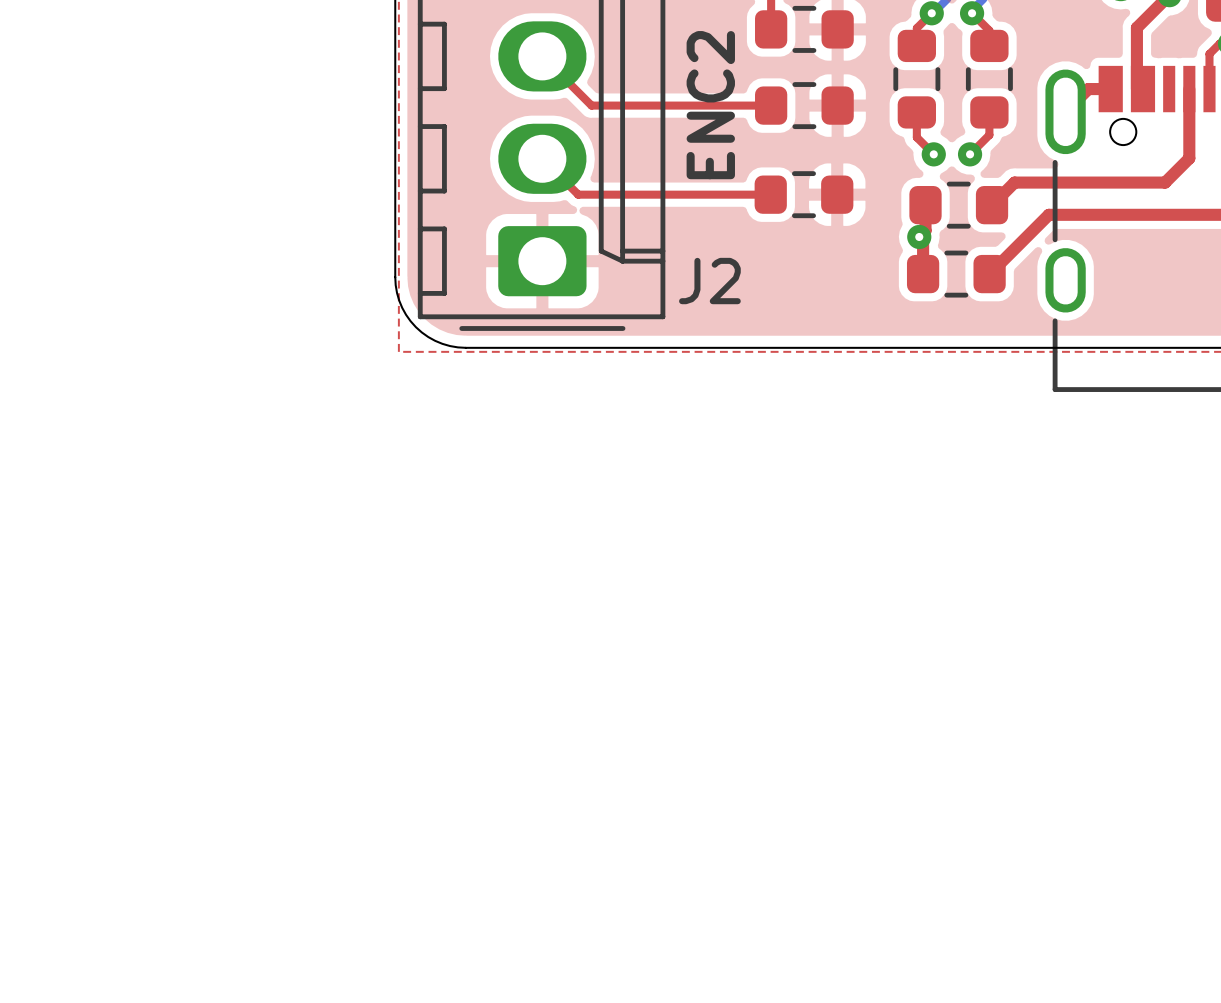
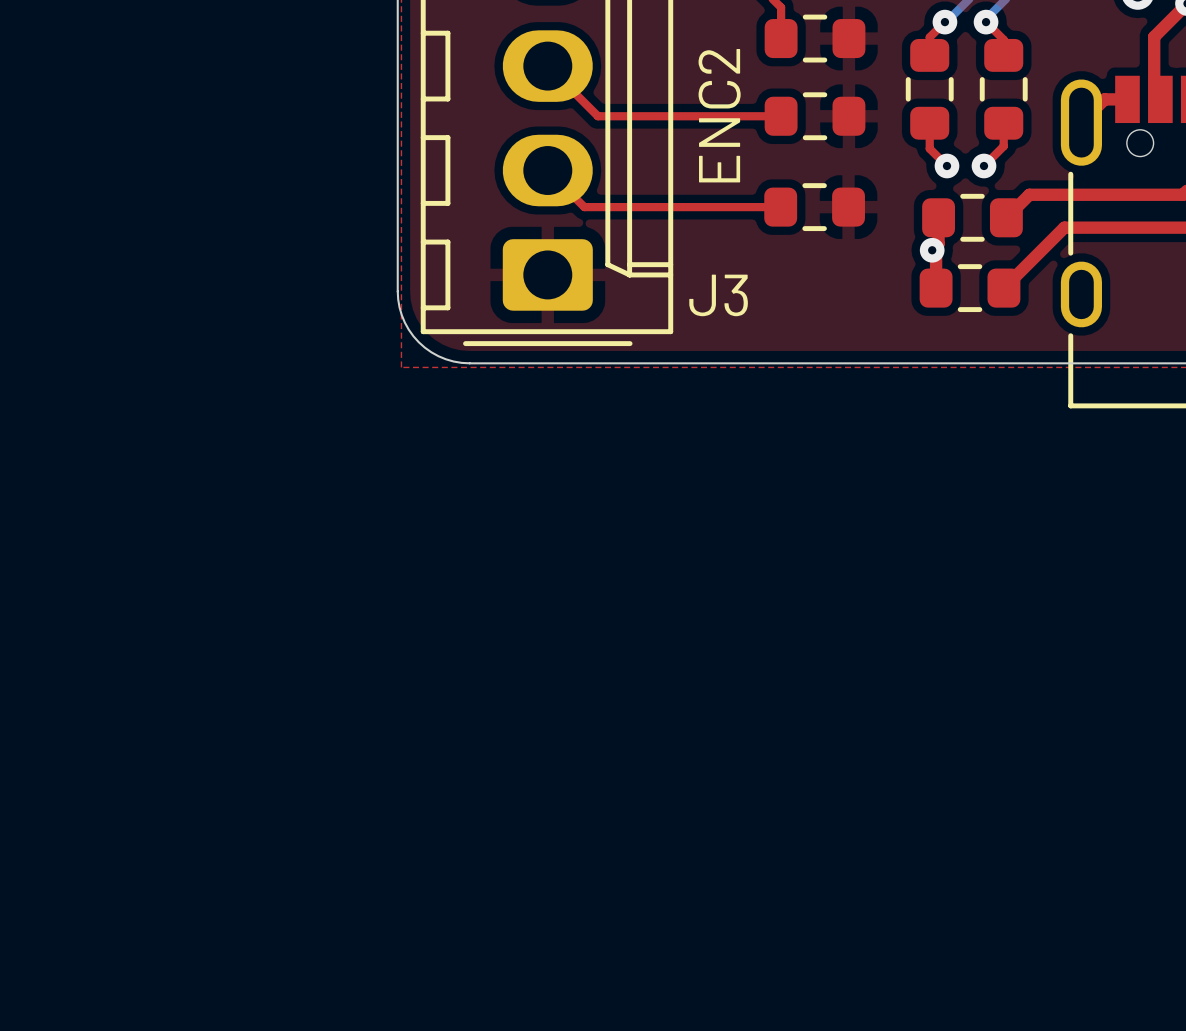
J2 name: J2 (709, 281) -> J3 (718, 295)

